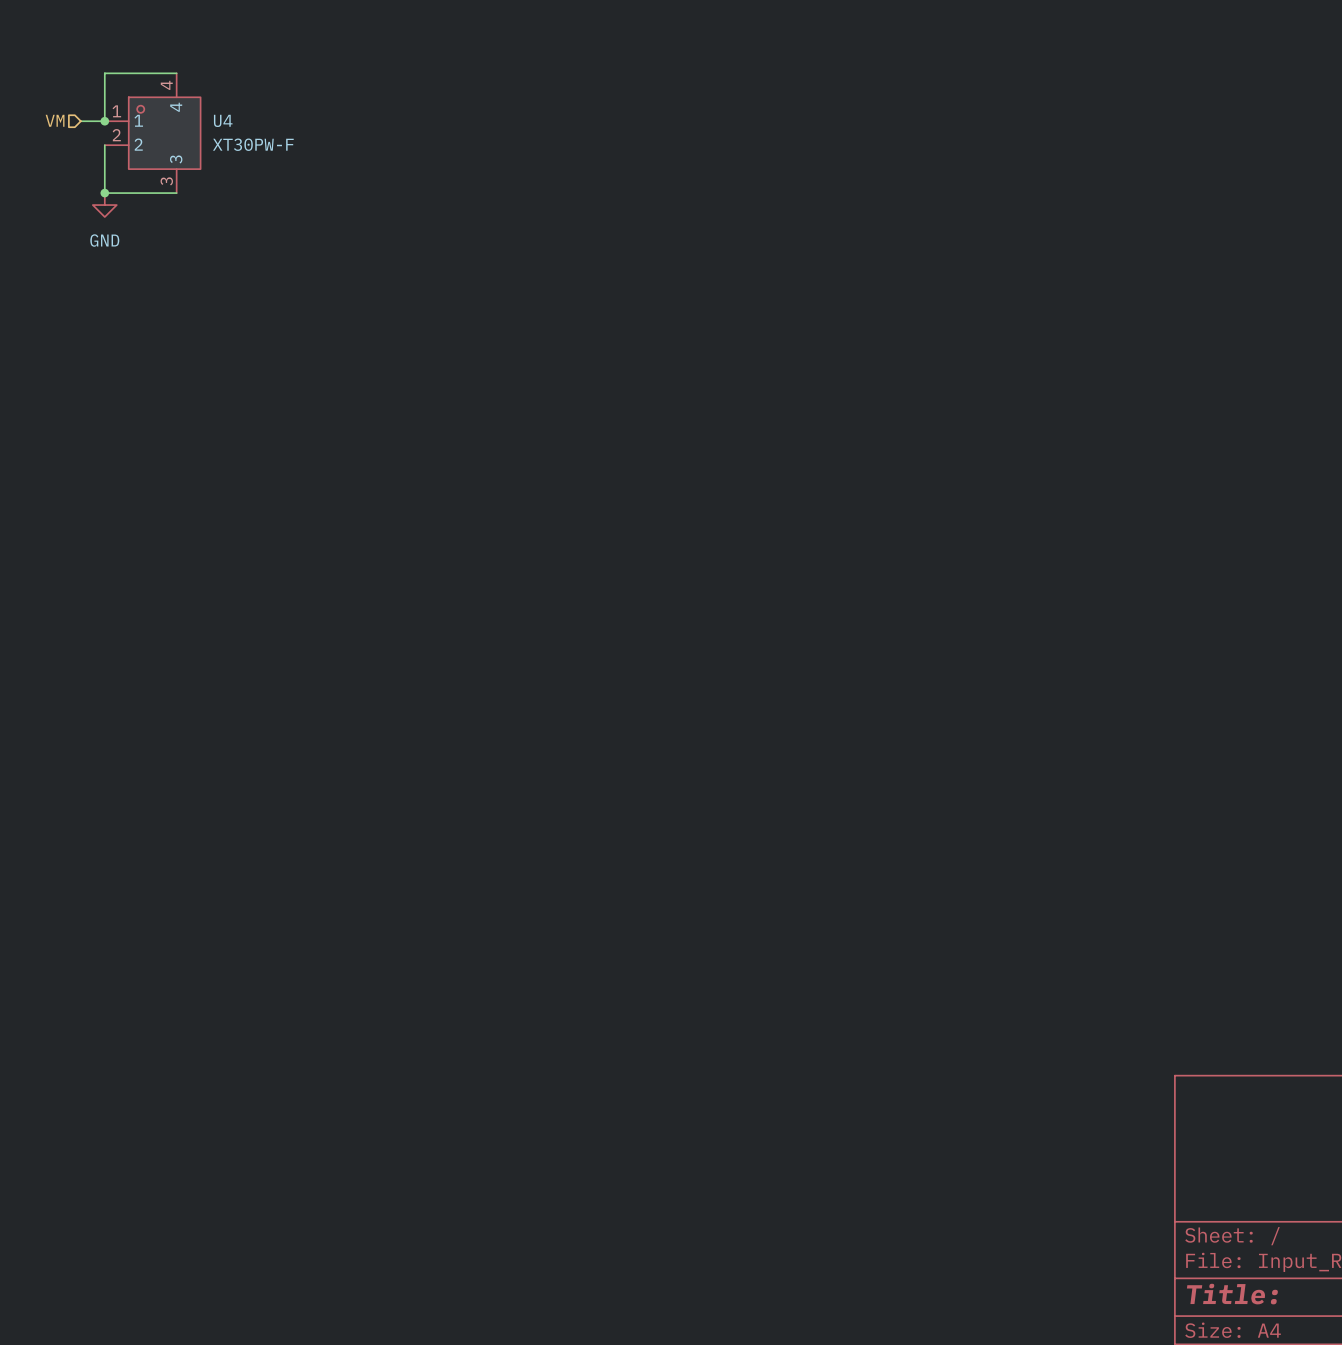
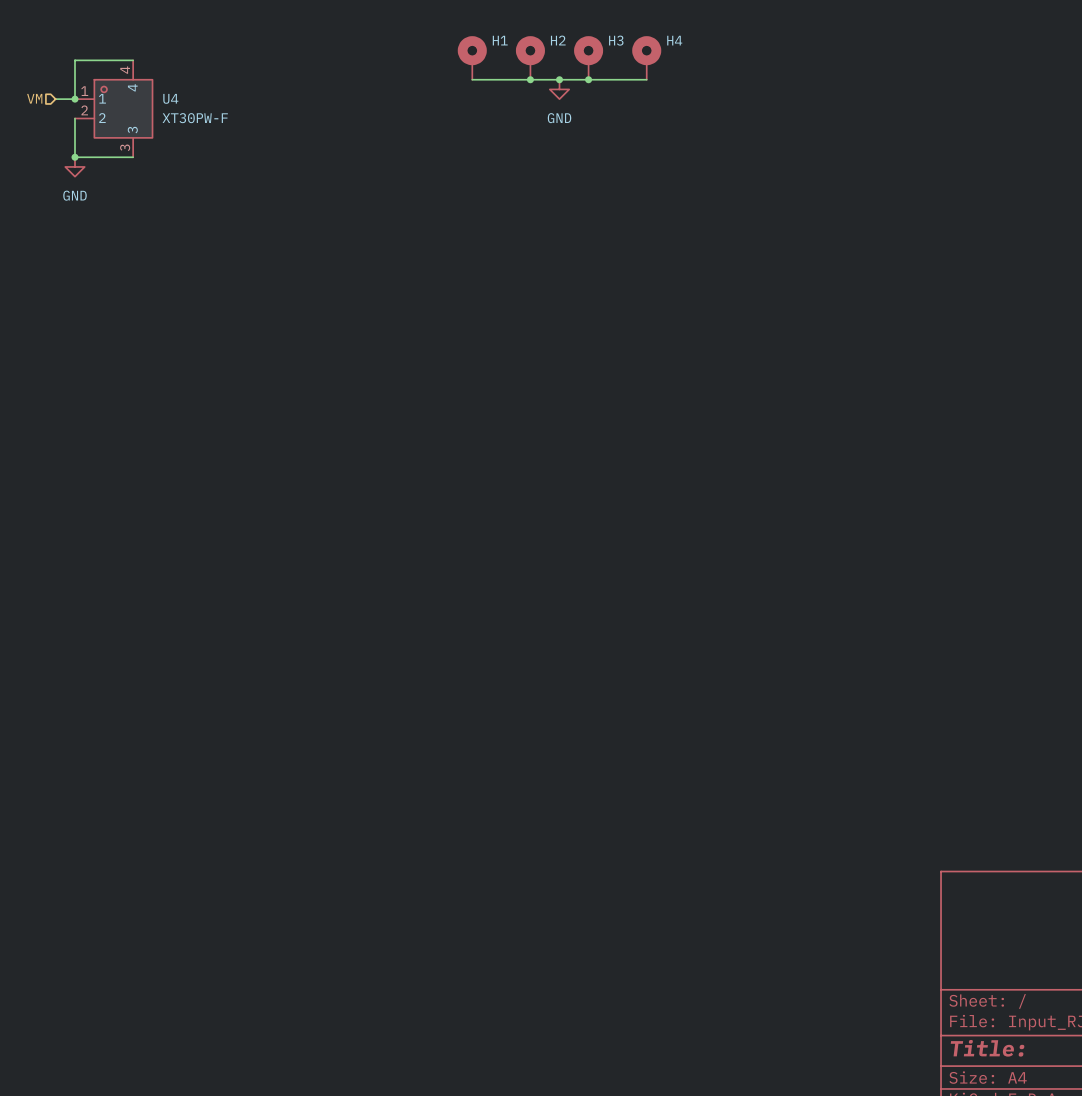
H1: none -> (472, 57)
H2: none -> (530, 57)
H3: none -> (588, 57)
H4: none -> (646, 57)
wire: none -> (472, 79) (646, 79)
junction: none -> (530, 79)
junction: none -> (559, 79)
junction: none -> (588, 79)
power symbol: none -> GND (559, 89)

